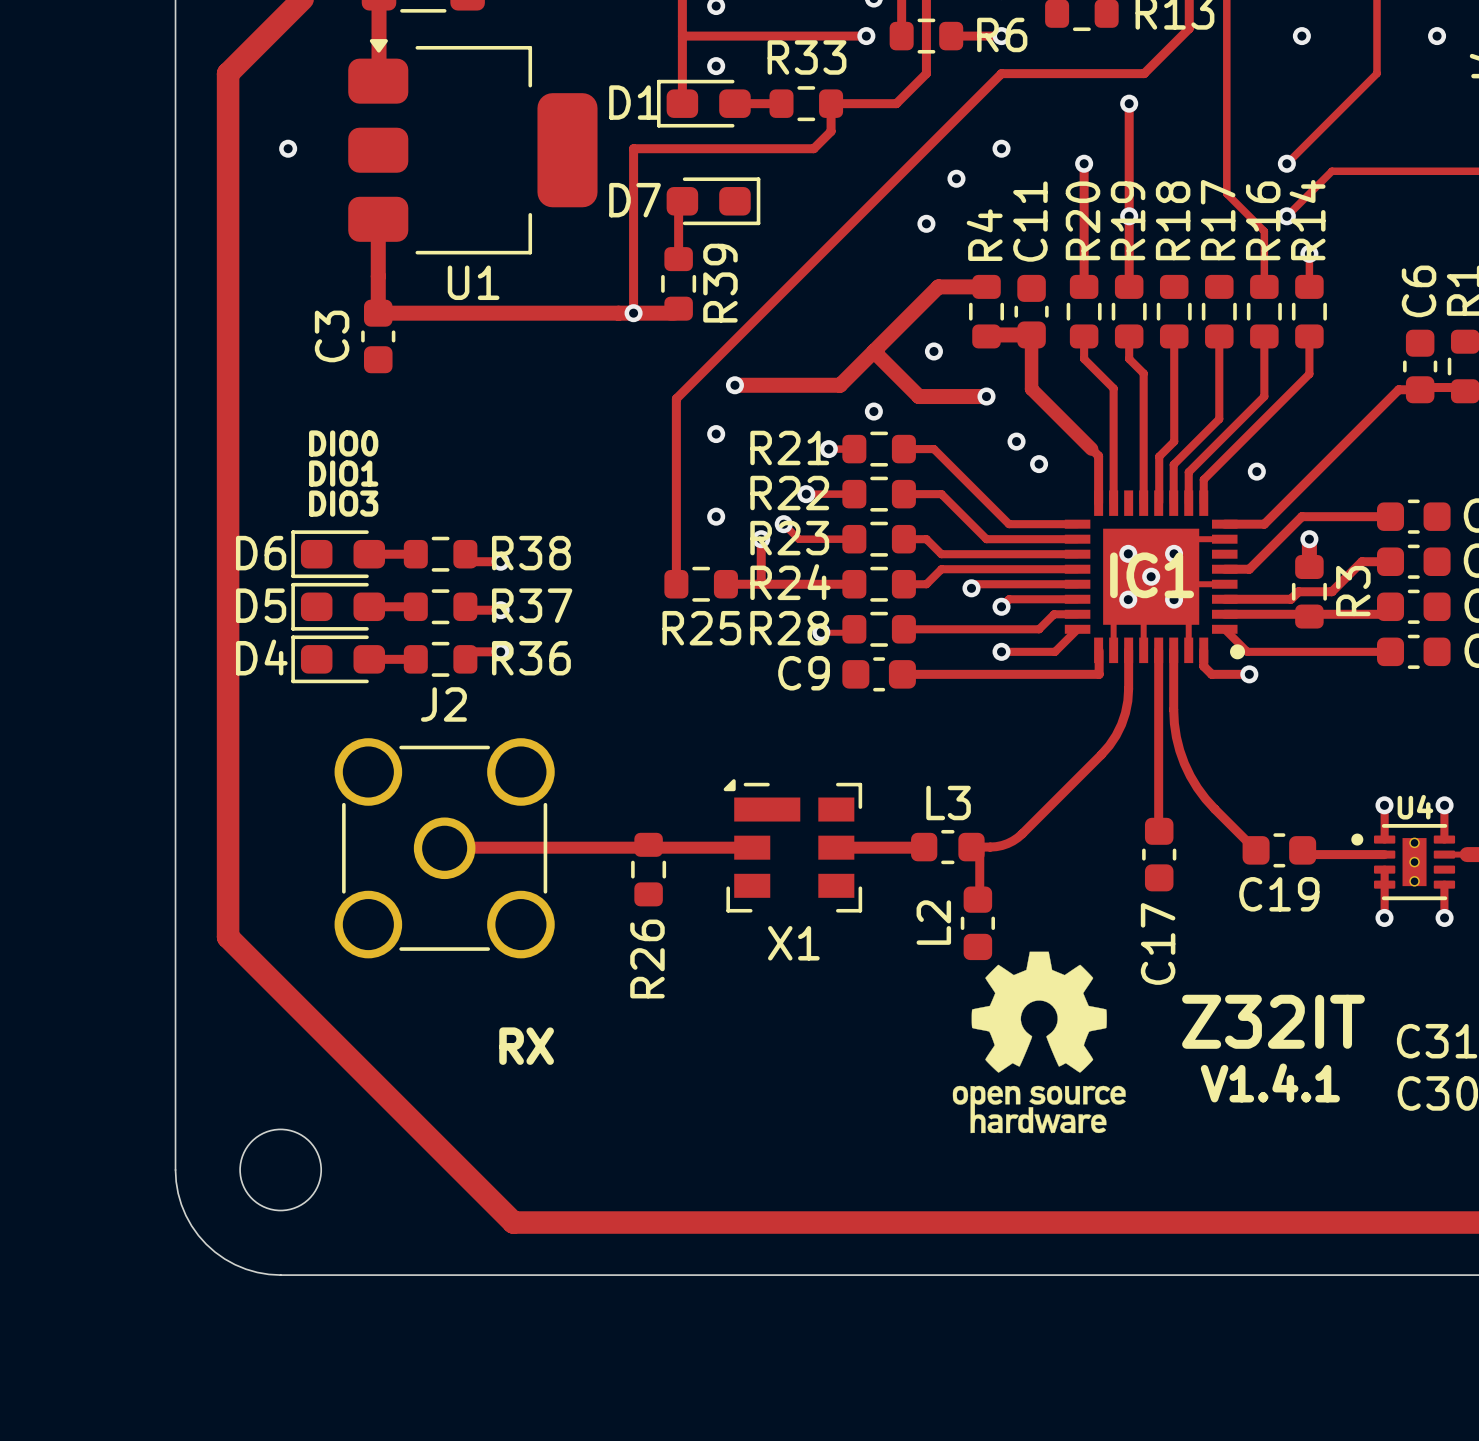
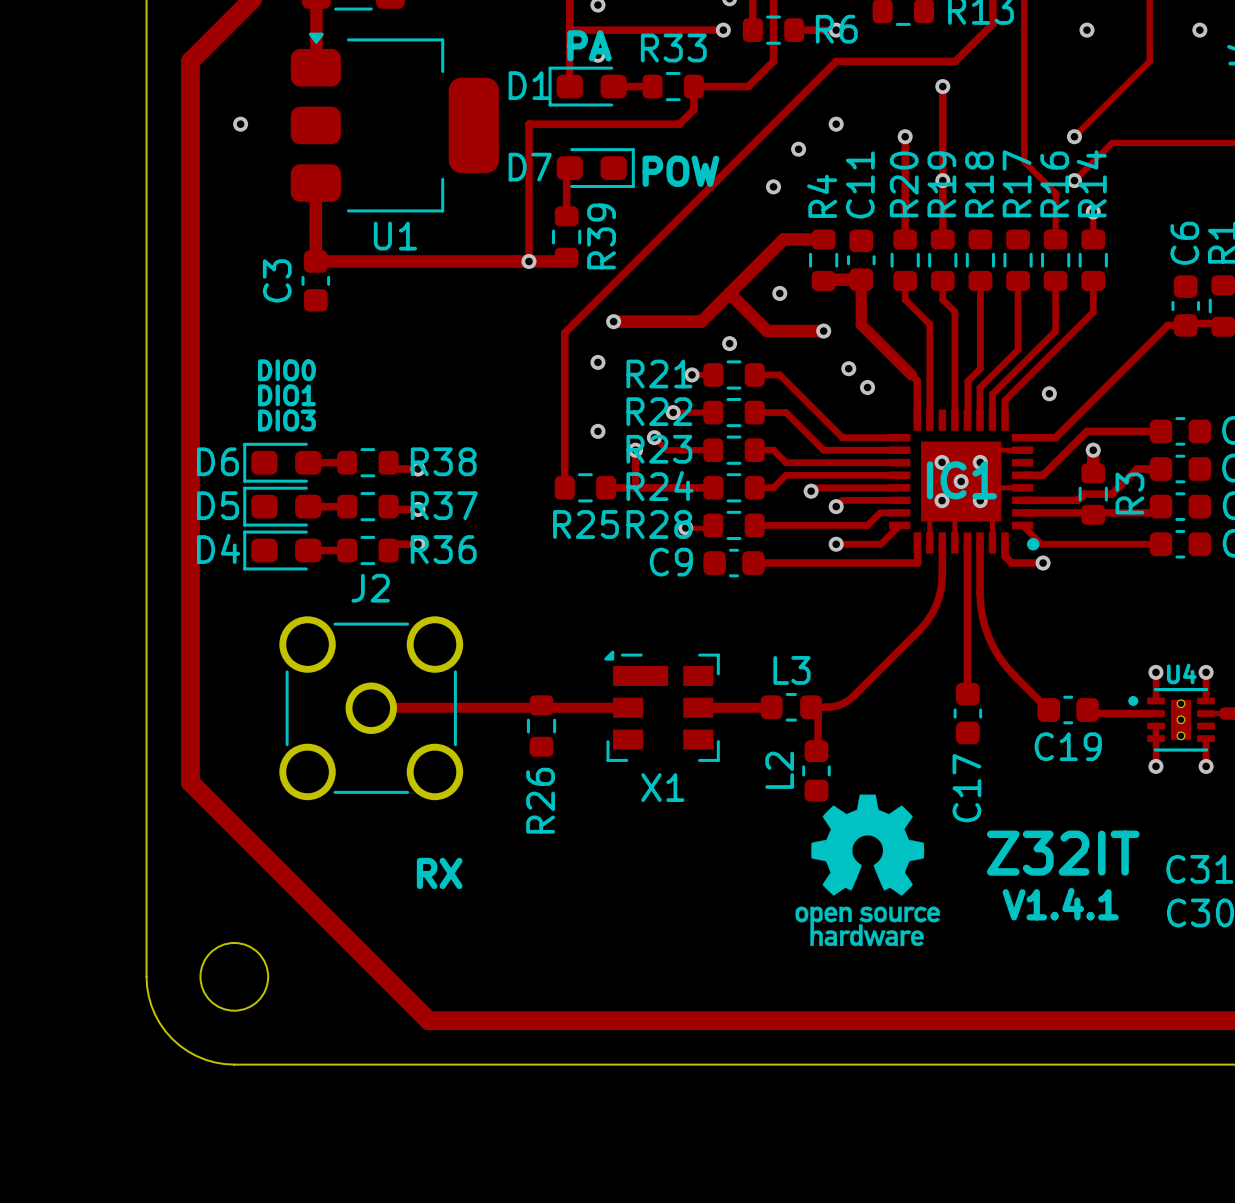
text: none -> PA (589, 45)
text: none -> POW (680, 171)

